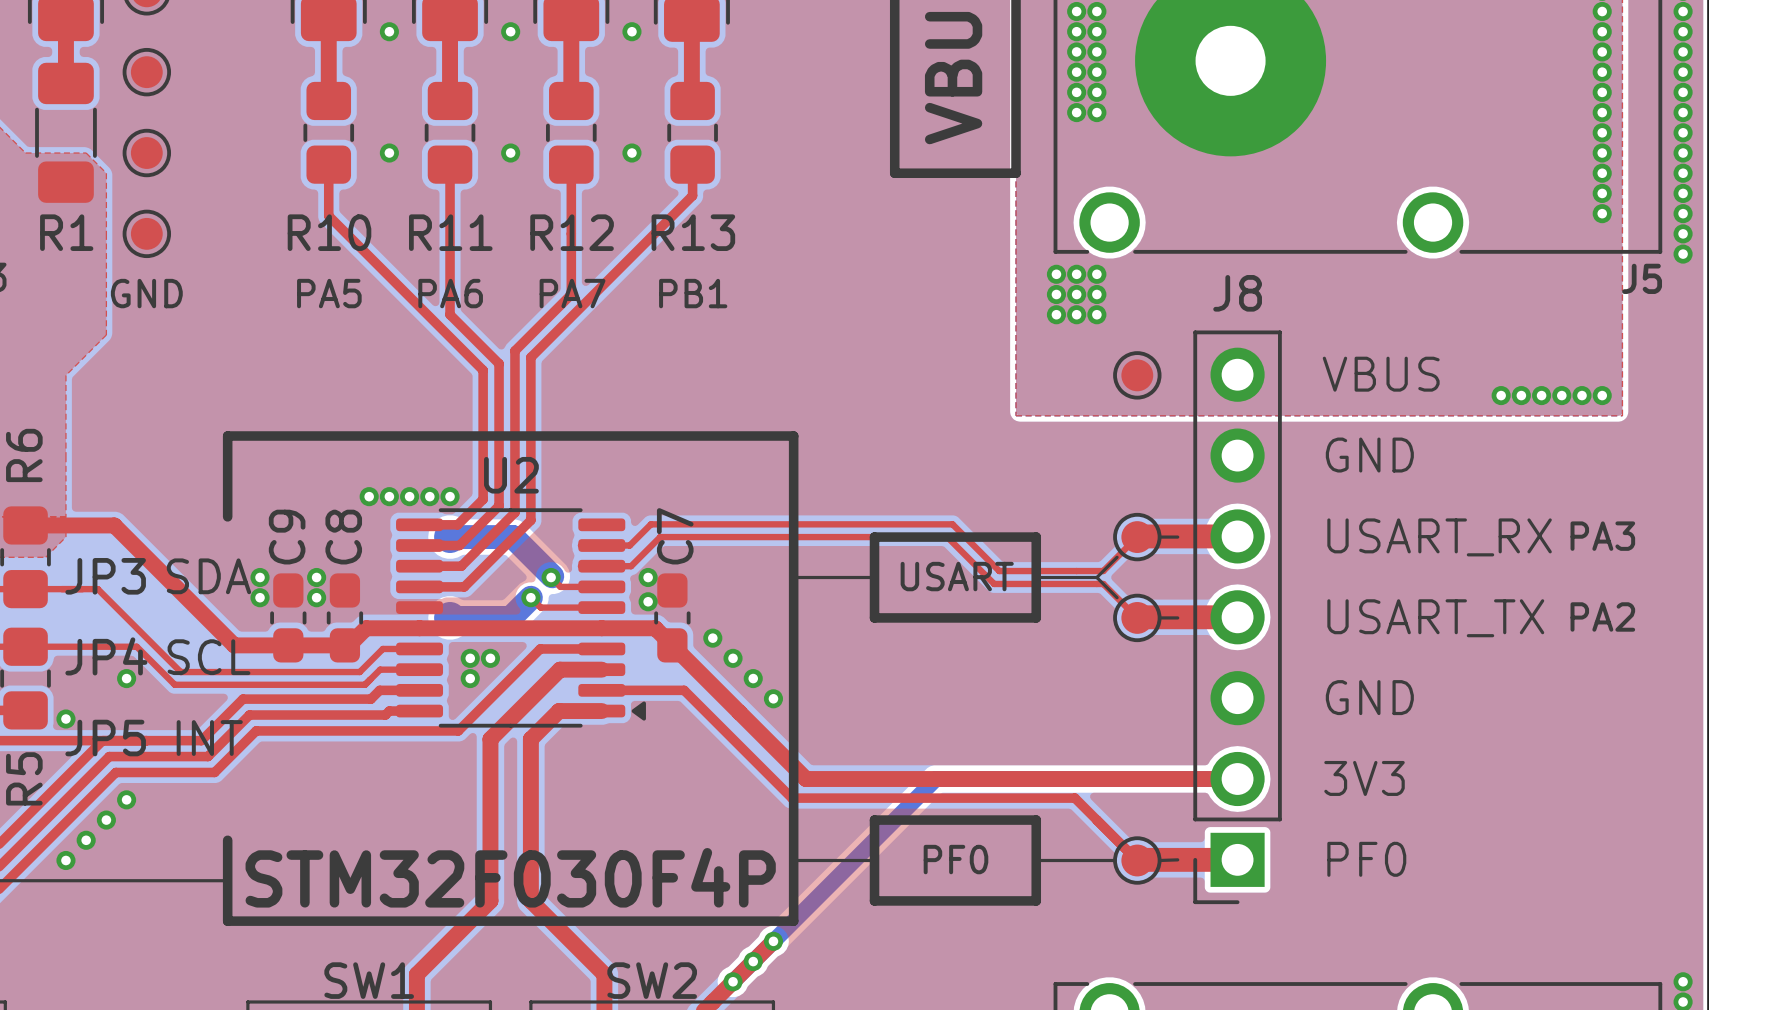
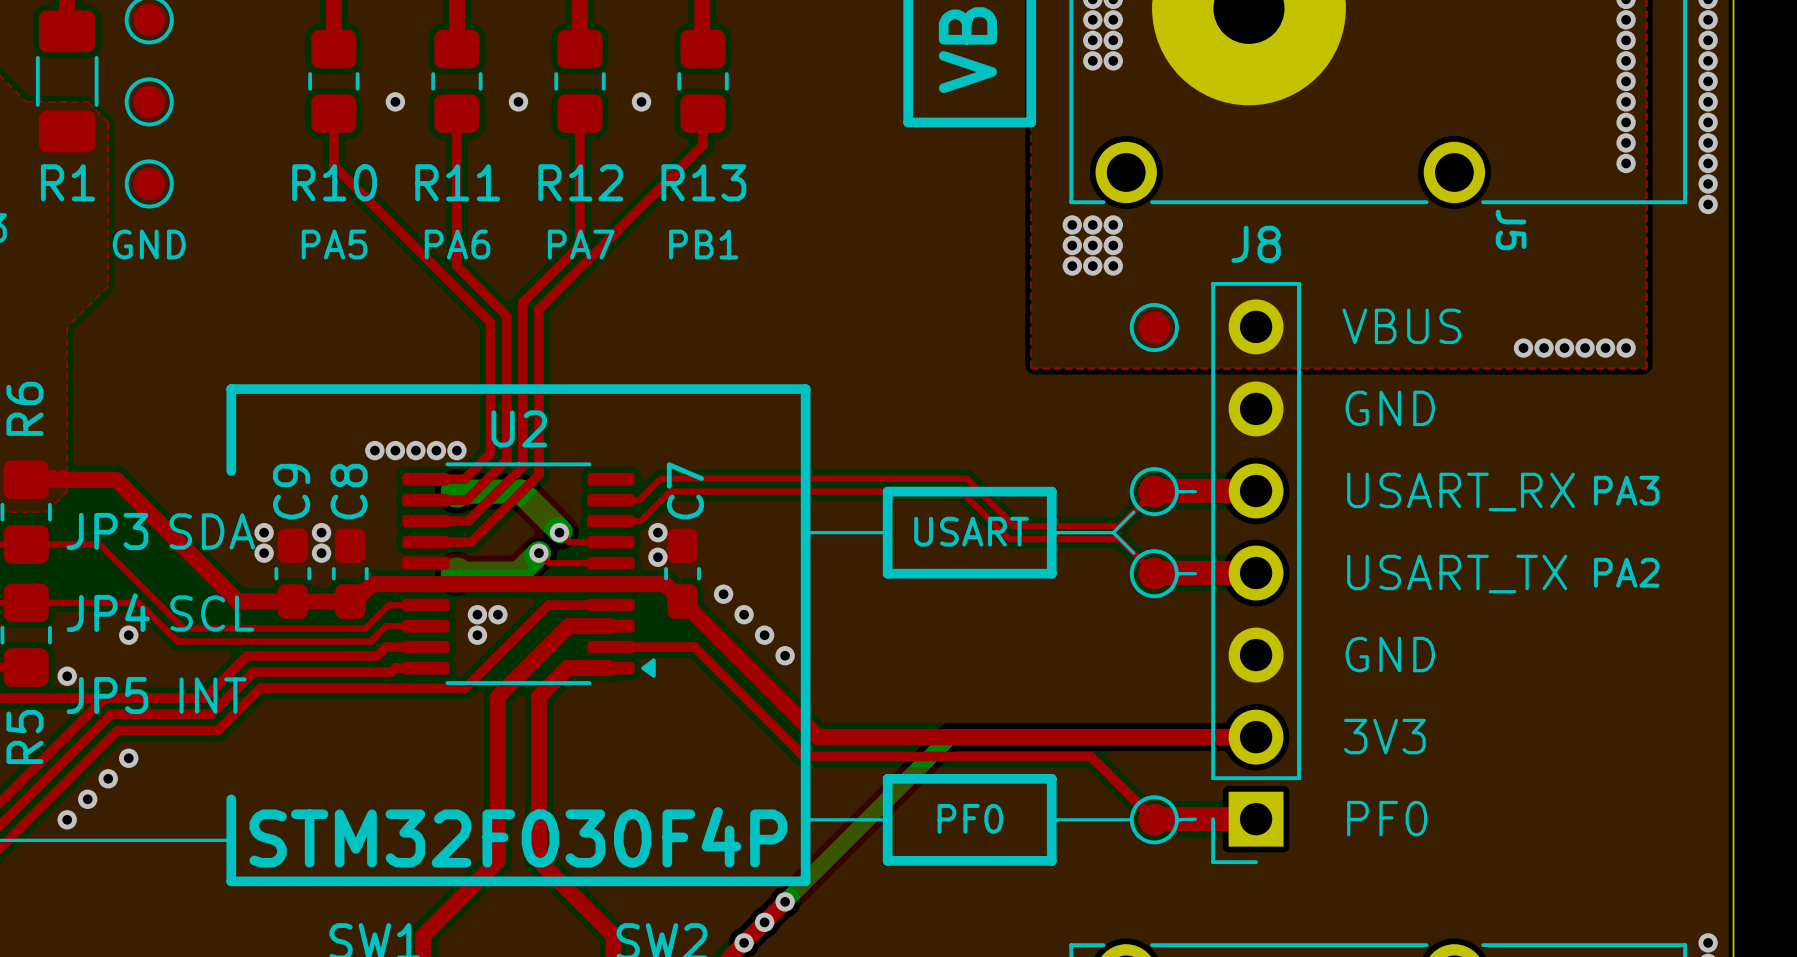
J5 name rotation: 0° (1642, 278) -> 90° clockwise (1511, 229)
J5 name position: J5 (1642, 278) -> J5 (1511, 229)

